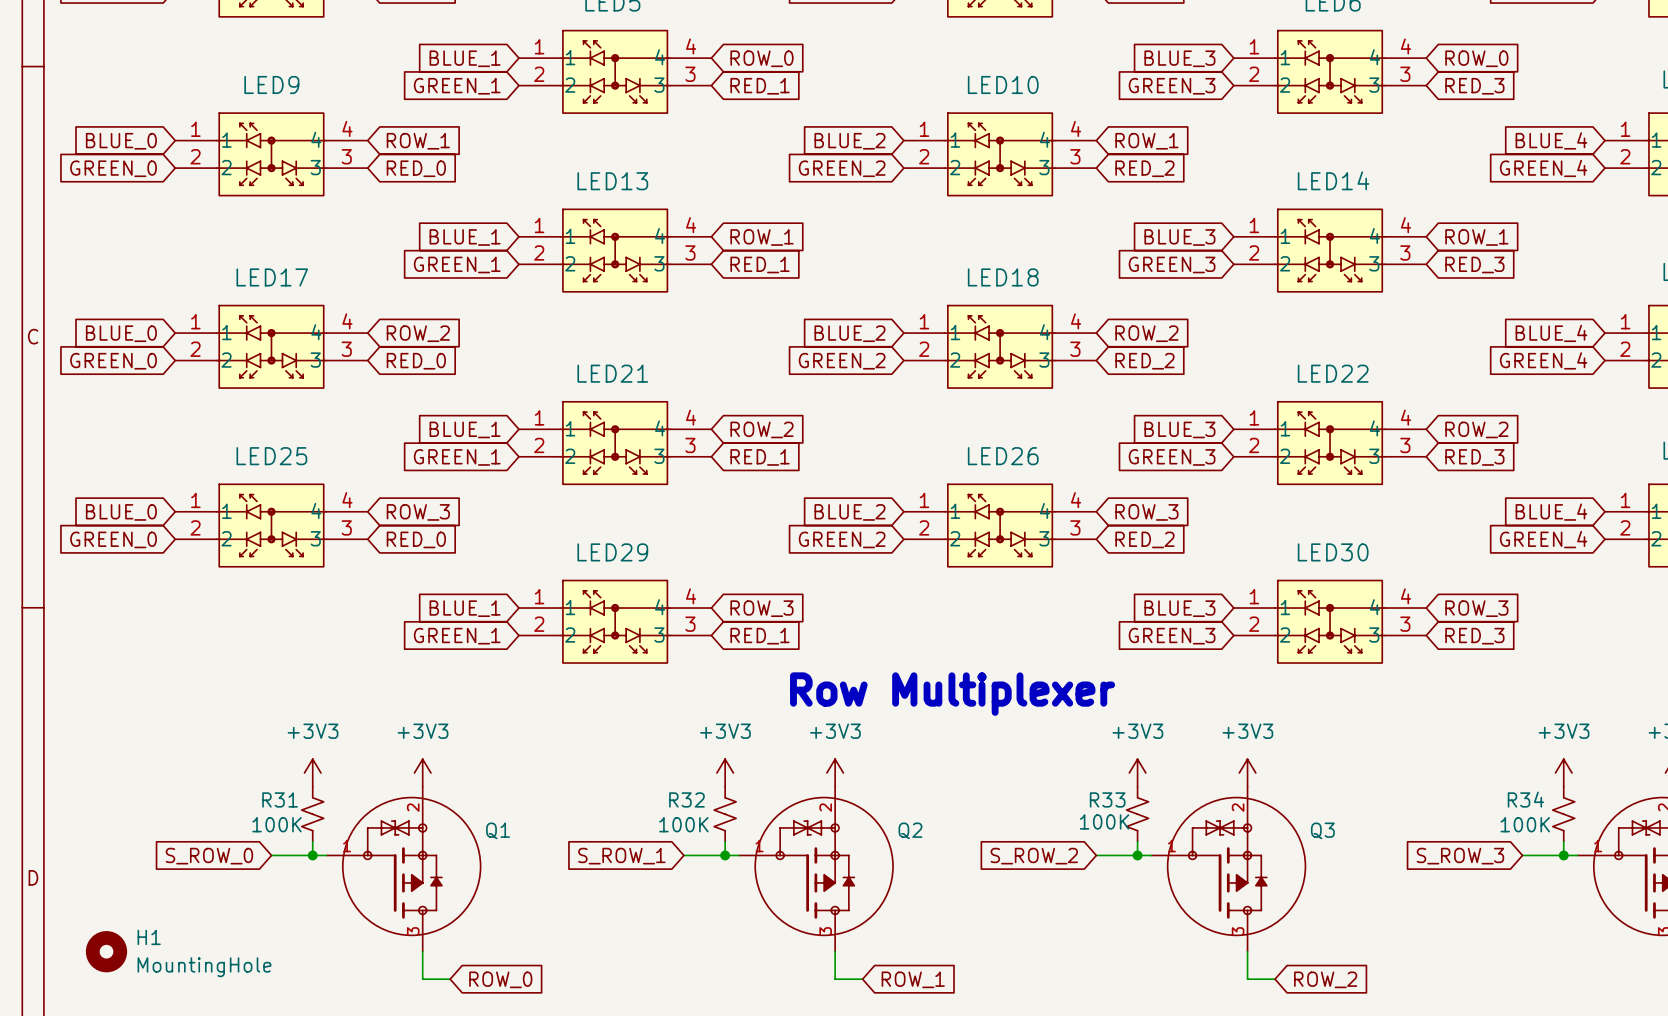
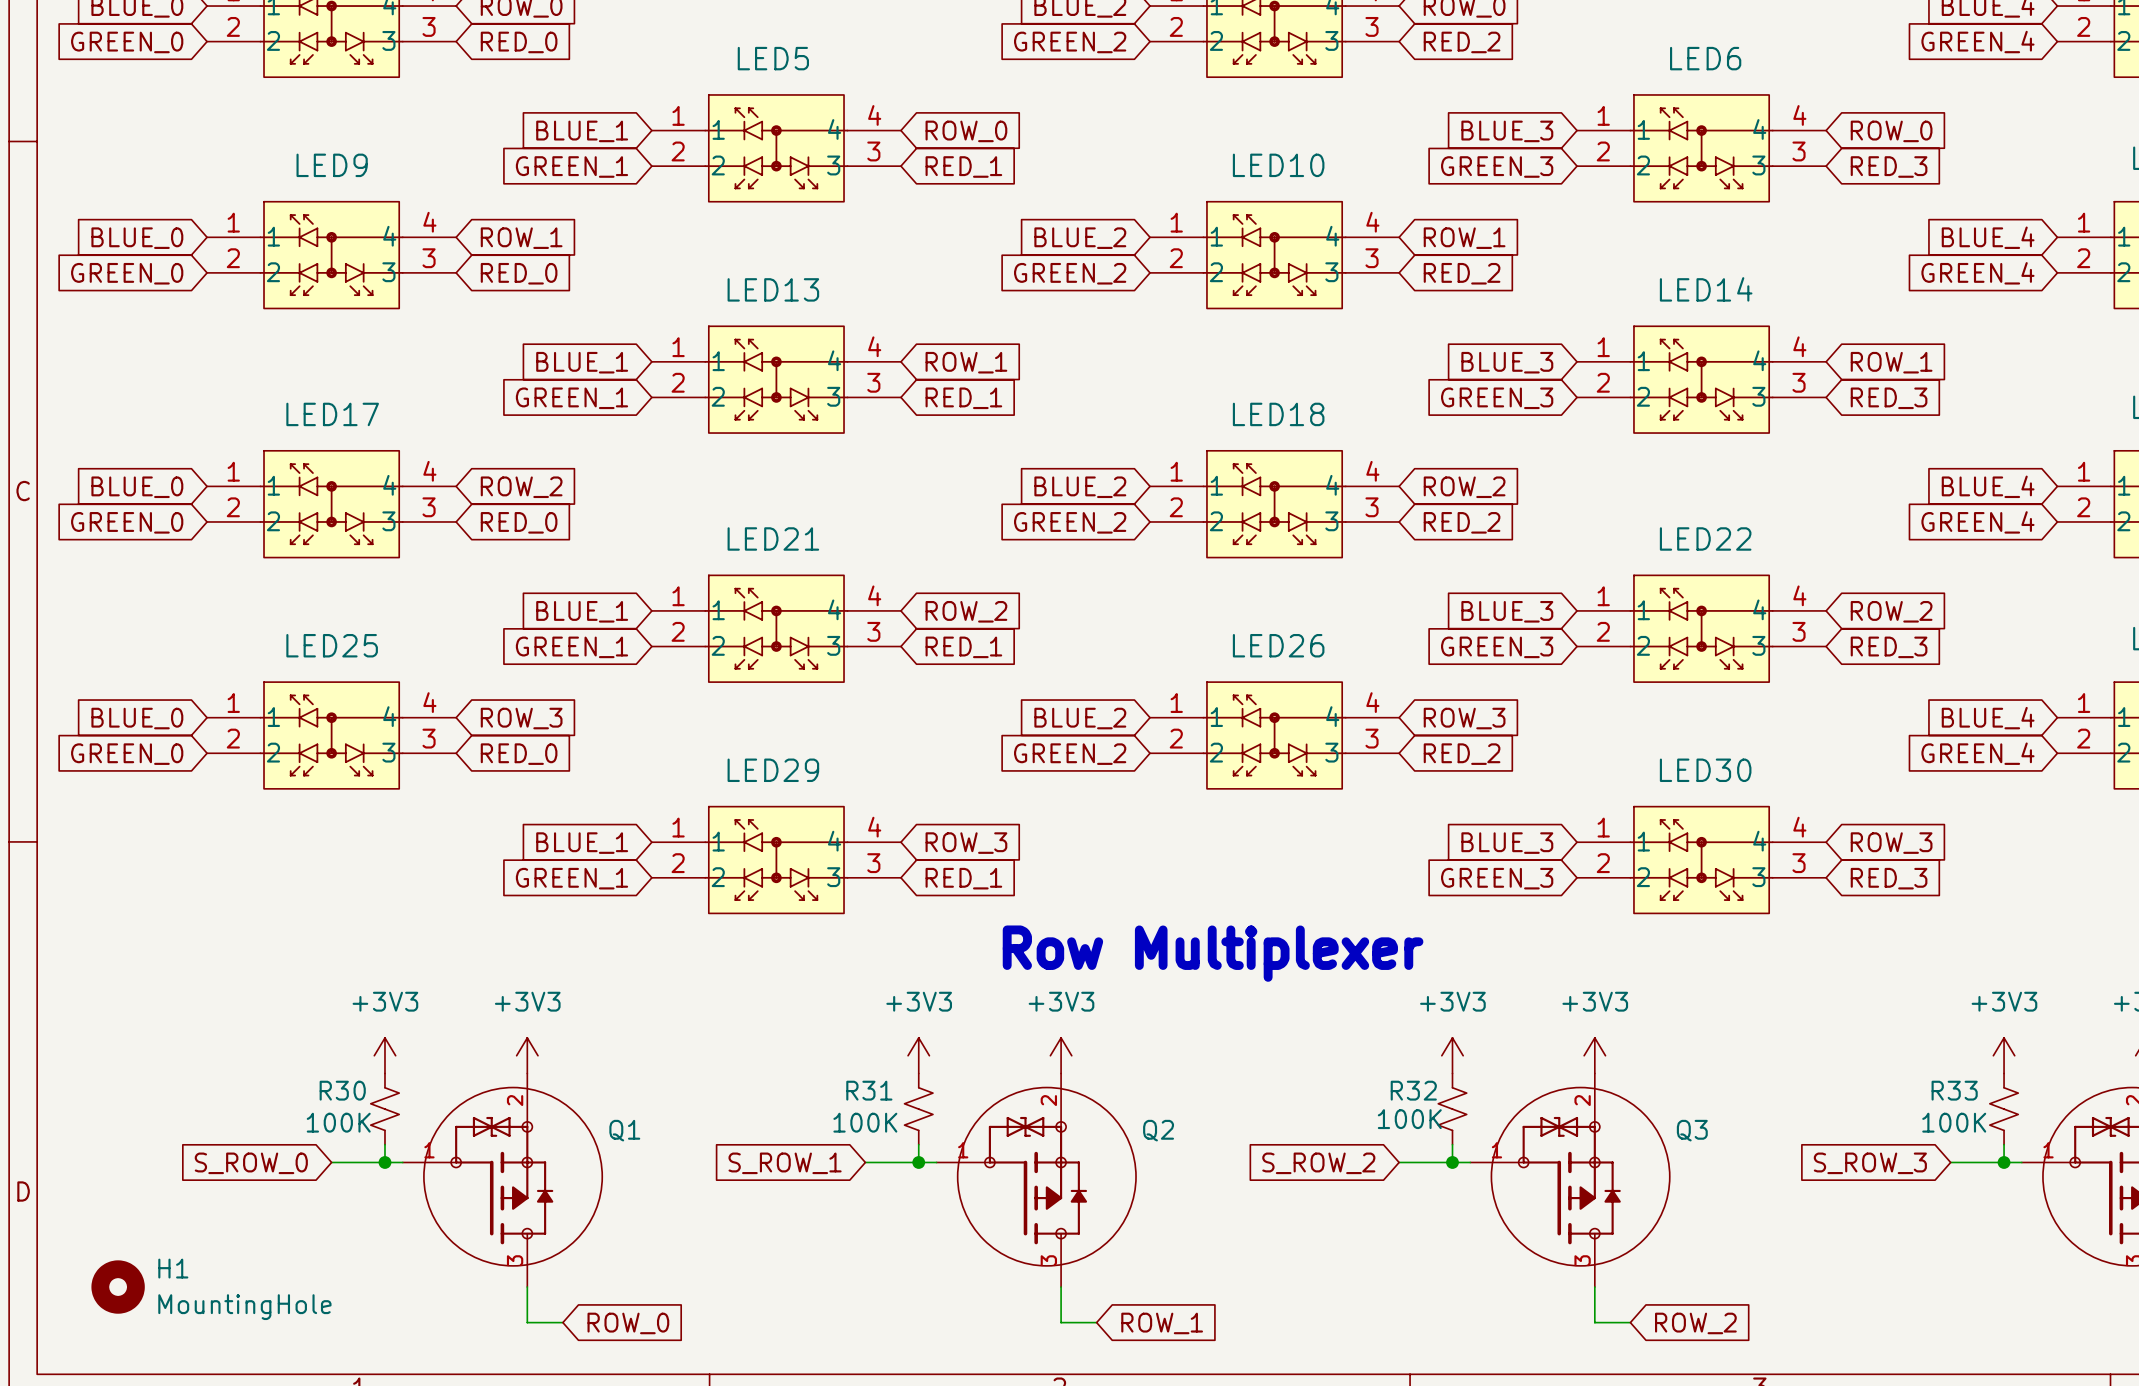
R31 name: R31 (280, 799) -> R30 (342, 1090)
R32 name: R32 (686, 799) -> R31 (869, 1090)
R33 name: R33 (1107, 799) -> R32 (1413, 1090)
R34 name: R34 (1525, 799) -> R33 (1954, 1090)

